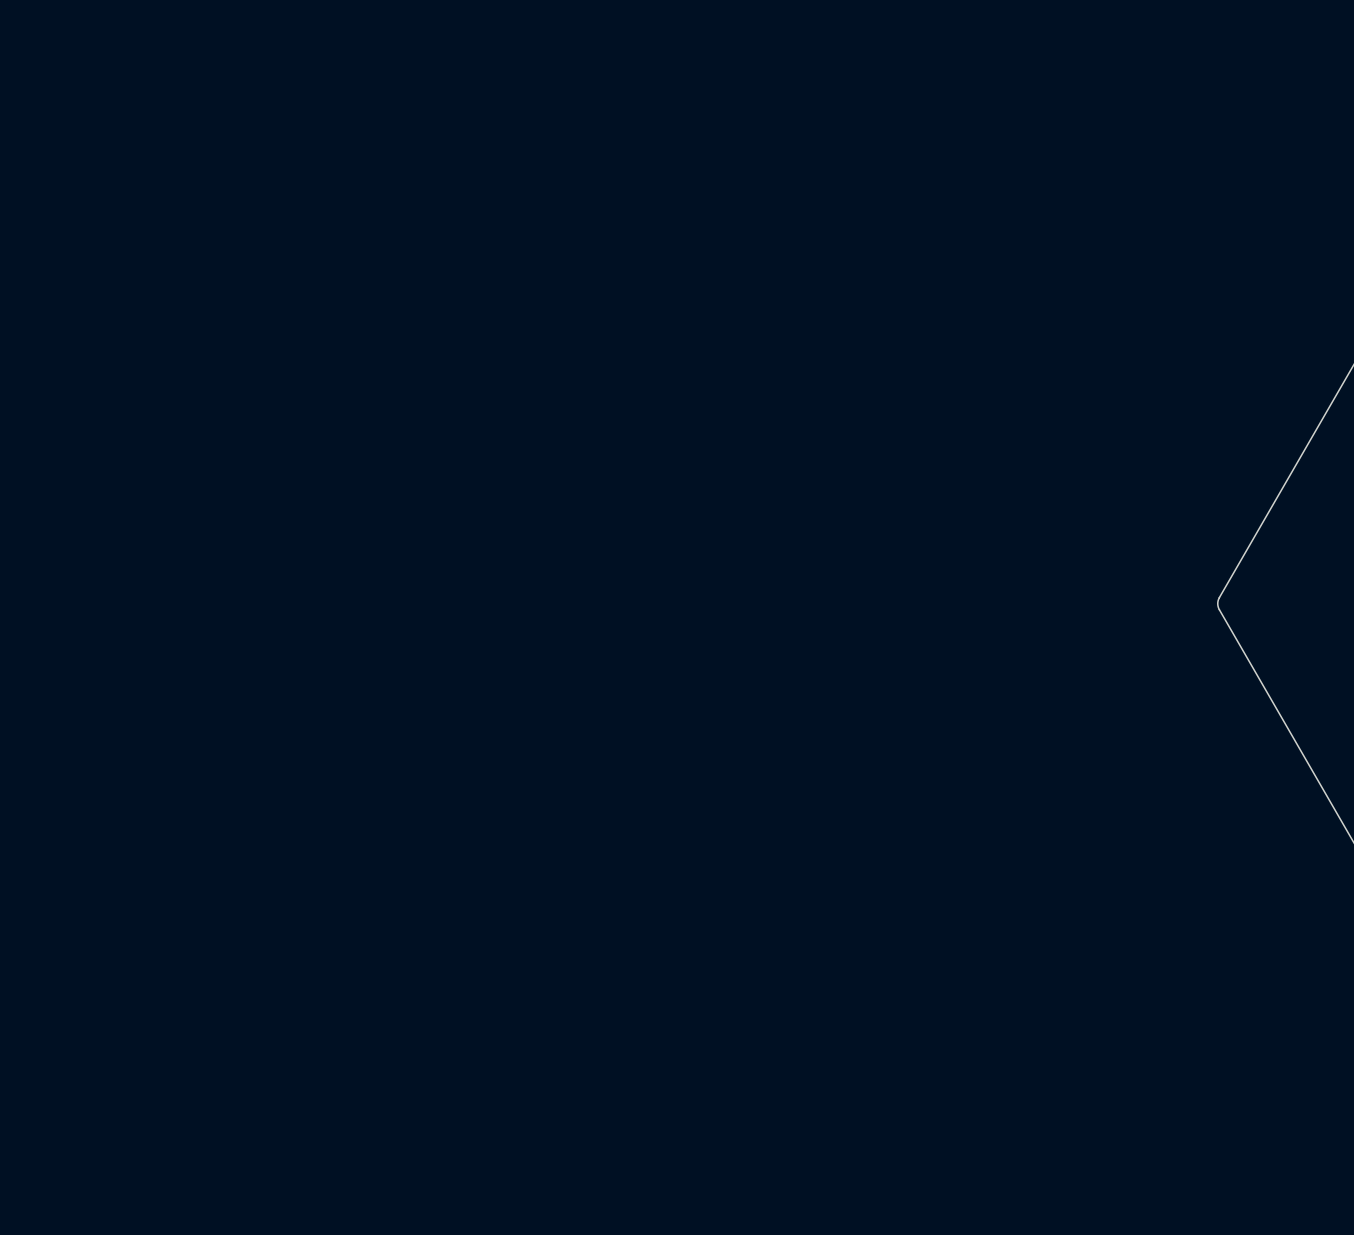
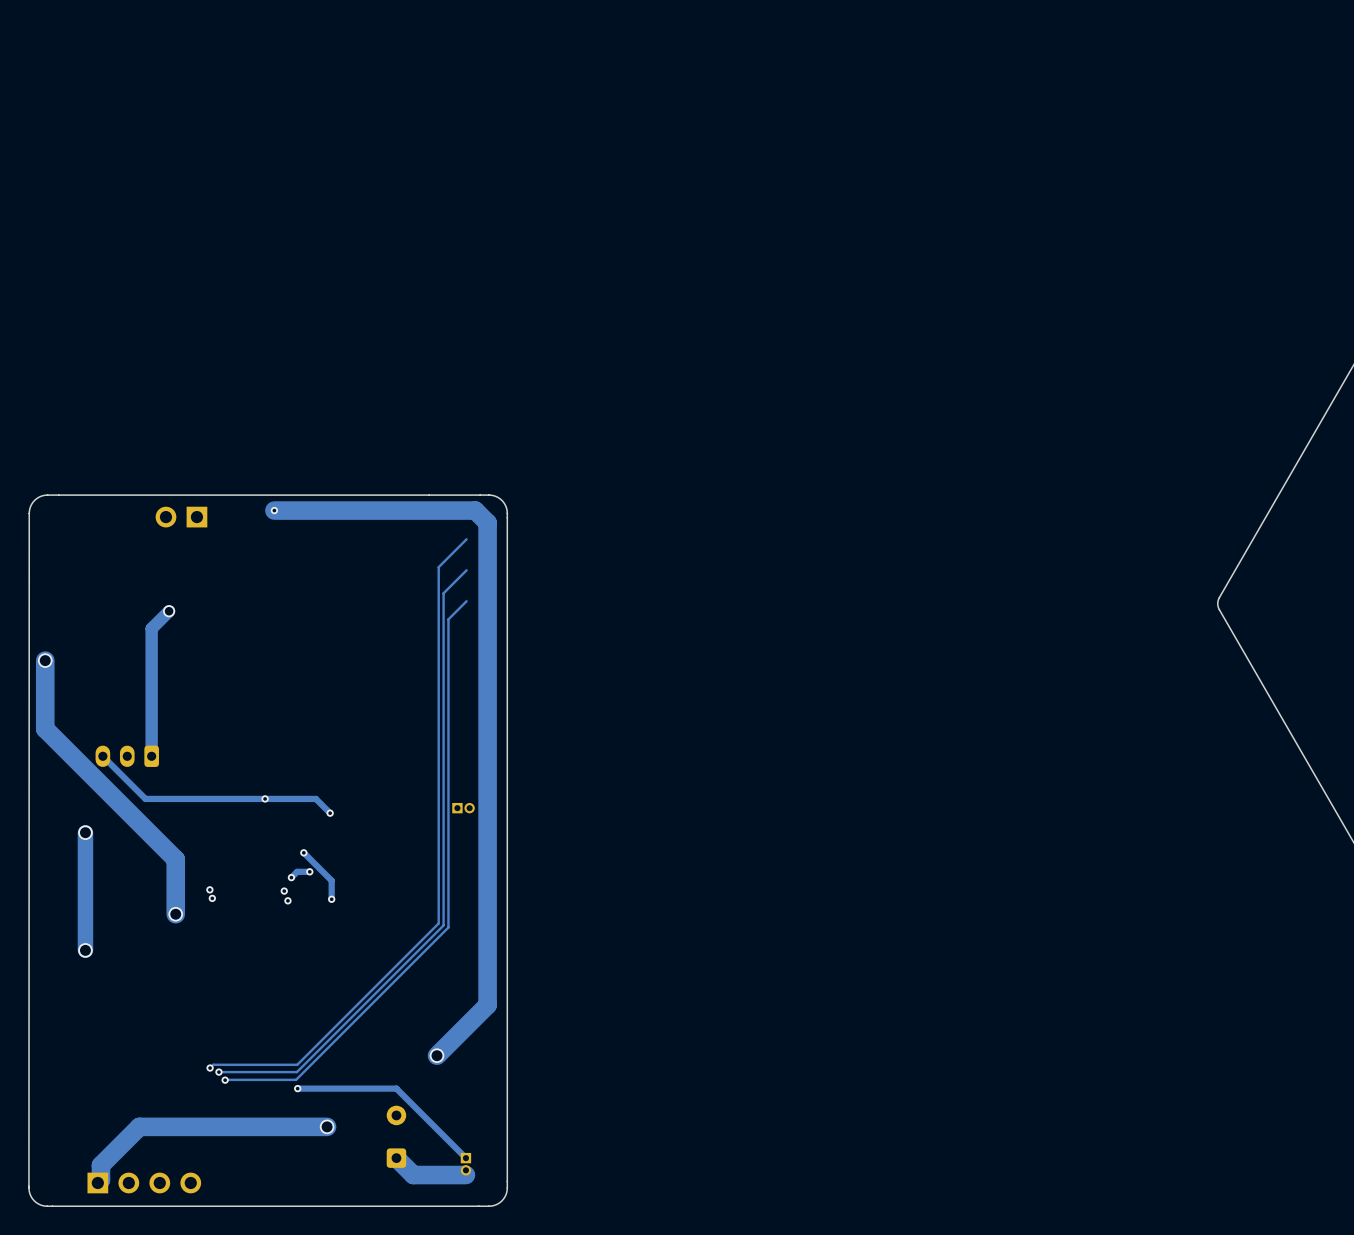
board edge: none -> (489, 495) (47, 495) (38, 497) (31, 504) (29, 513) (28, 1187) (31, 1197) (37, 1203) (47, 1206) (489, 1206) (498, 1203) (504, 1197) (507, 1187) (507, 513) (501, 500) (489, 495)
track: none -> (274, 510) (475, 510) (487, 522) (487, 1005) (437, 1055)
via: none -> (274, 510)
part: none -> (181, 517)
track: none -> (466, 539) (438, 567) (438, 923) (297, 1064) (213, 1064) (210, 1068)
track: none -> (466, 570) (443, 593) (443, 925) (296, 1072) (218, 1072)
track: none -> (466, 601) (448, 619) (448, 927) (296, 1079) (225, 1079)
track: none -> (169, 611) (151, 628) (151, 756)
via: none -> (169, 611)
track: none -> (45, 660) (45, 728) (175, 859) (175, 914)
via: none -> (45, 660)
track: none -> (102, 756) (145, 798) (315, 798) (330, 813)
part: none -> (127, 756)
via: none -> (265, 798)
part: none -> (463, 808)
via: none -> (330, 813)
track: none -> (85, 832) (85, 950)
via: none -> (85, 832)
track: none -> (303, 852) (331, 880) (331, 899)
via: none -> (303, 852)
track: none -> (309, 871) (297, 871) (291, 877)
via: none -> (309, 871)
via: none -> (291, 877)
via: none -> (209, 889)
via: none -> (284, 891)
via: none -> (212, 898)
via: none -> (331, 899)
via: none -> (287, 900)
via: none -> (175, 914)
via: none -> (85, 950)
via: none -> (437, 1055)
via: none -> (210, 1068)
via: none -> (218, 1072)
via: none -> (225, 1080)
track: none -> (297, 1088) (396, 1088) (465, 1158)
via: none -> (297, 1088)
track: none -> (327, 1126) (139, 1126) (100, 1165) (100, 1179) (97, 1182)
via: none -> (327, 1126)
part: none -> (396, 1136)
track: none -> (396, 1158) (413, 1175) (465, 1175)
part: none -> (465, 1164)
part: none -> (144, 1182)

